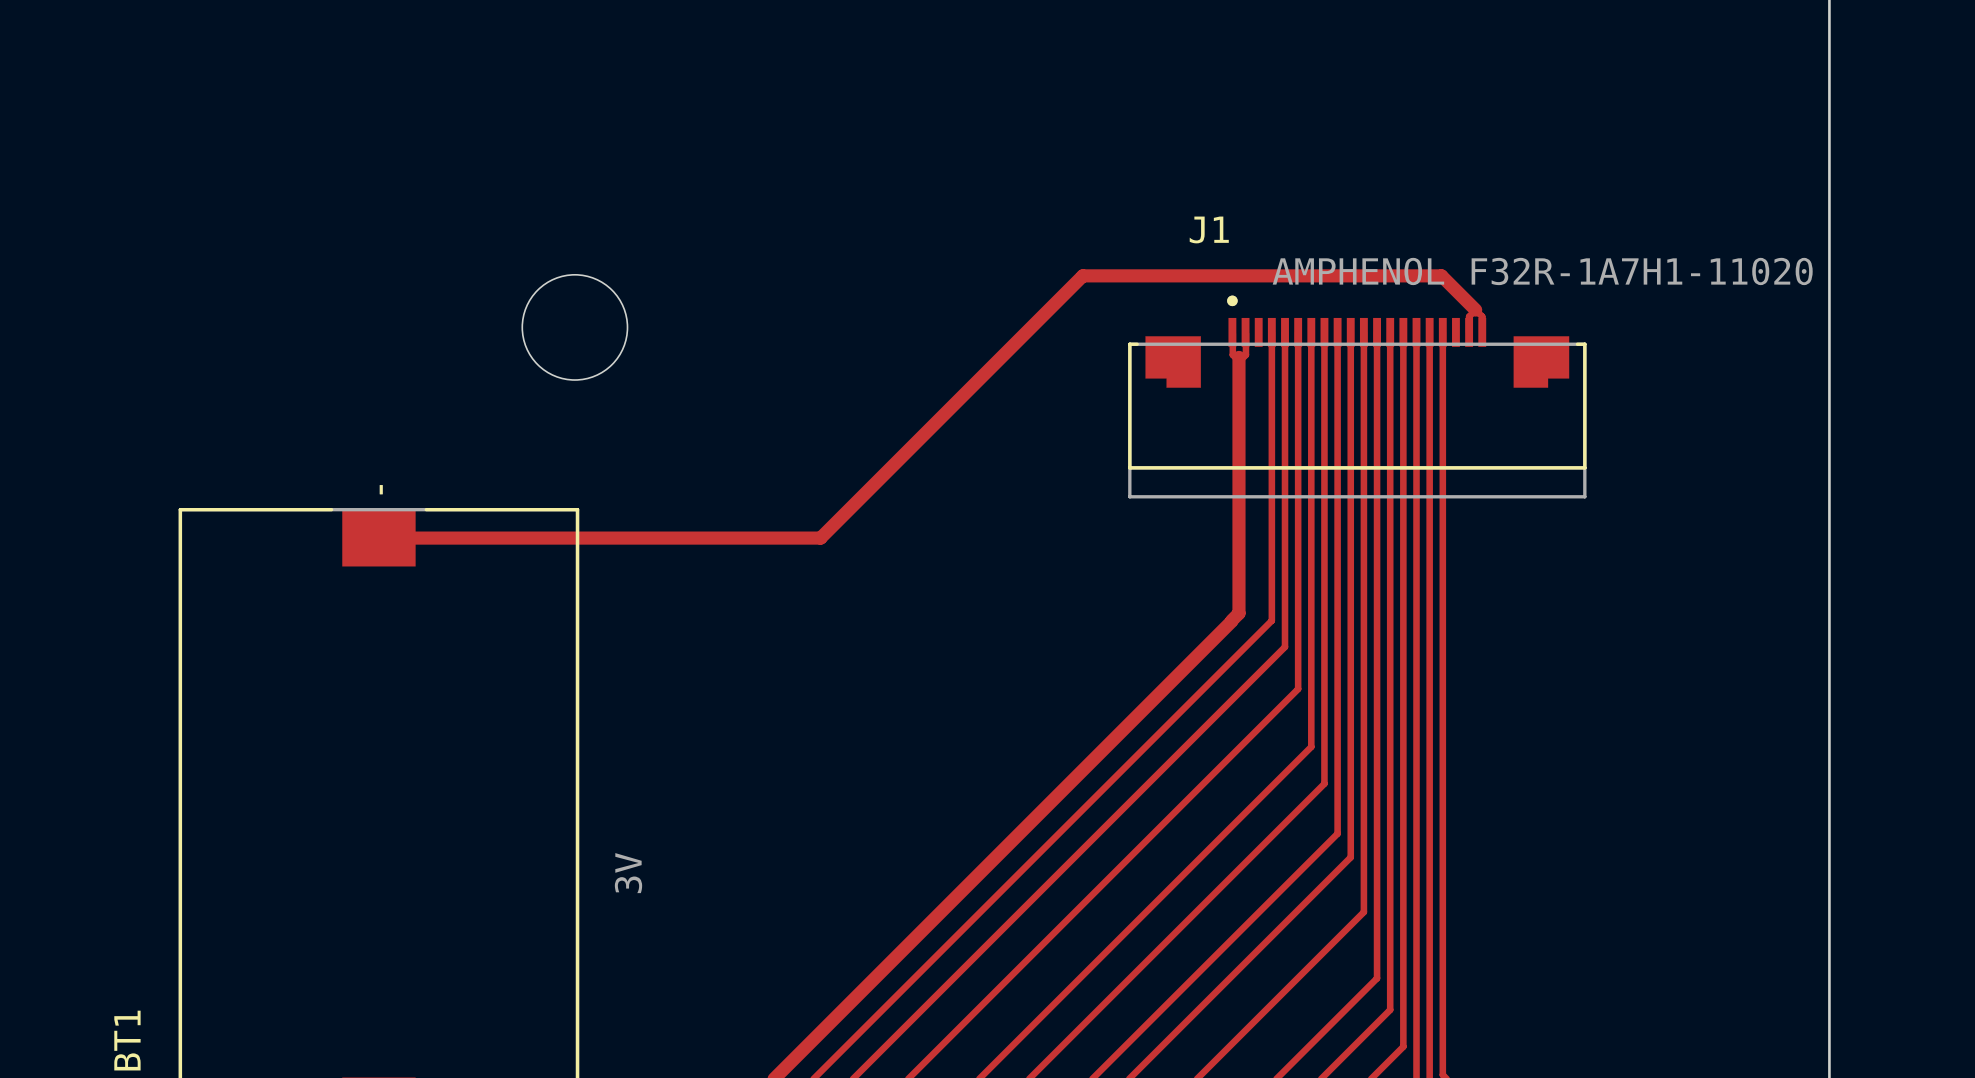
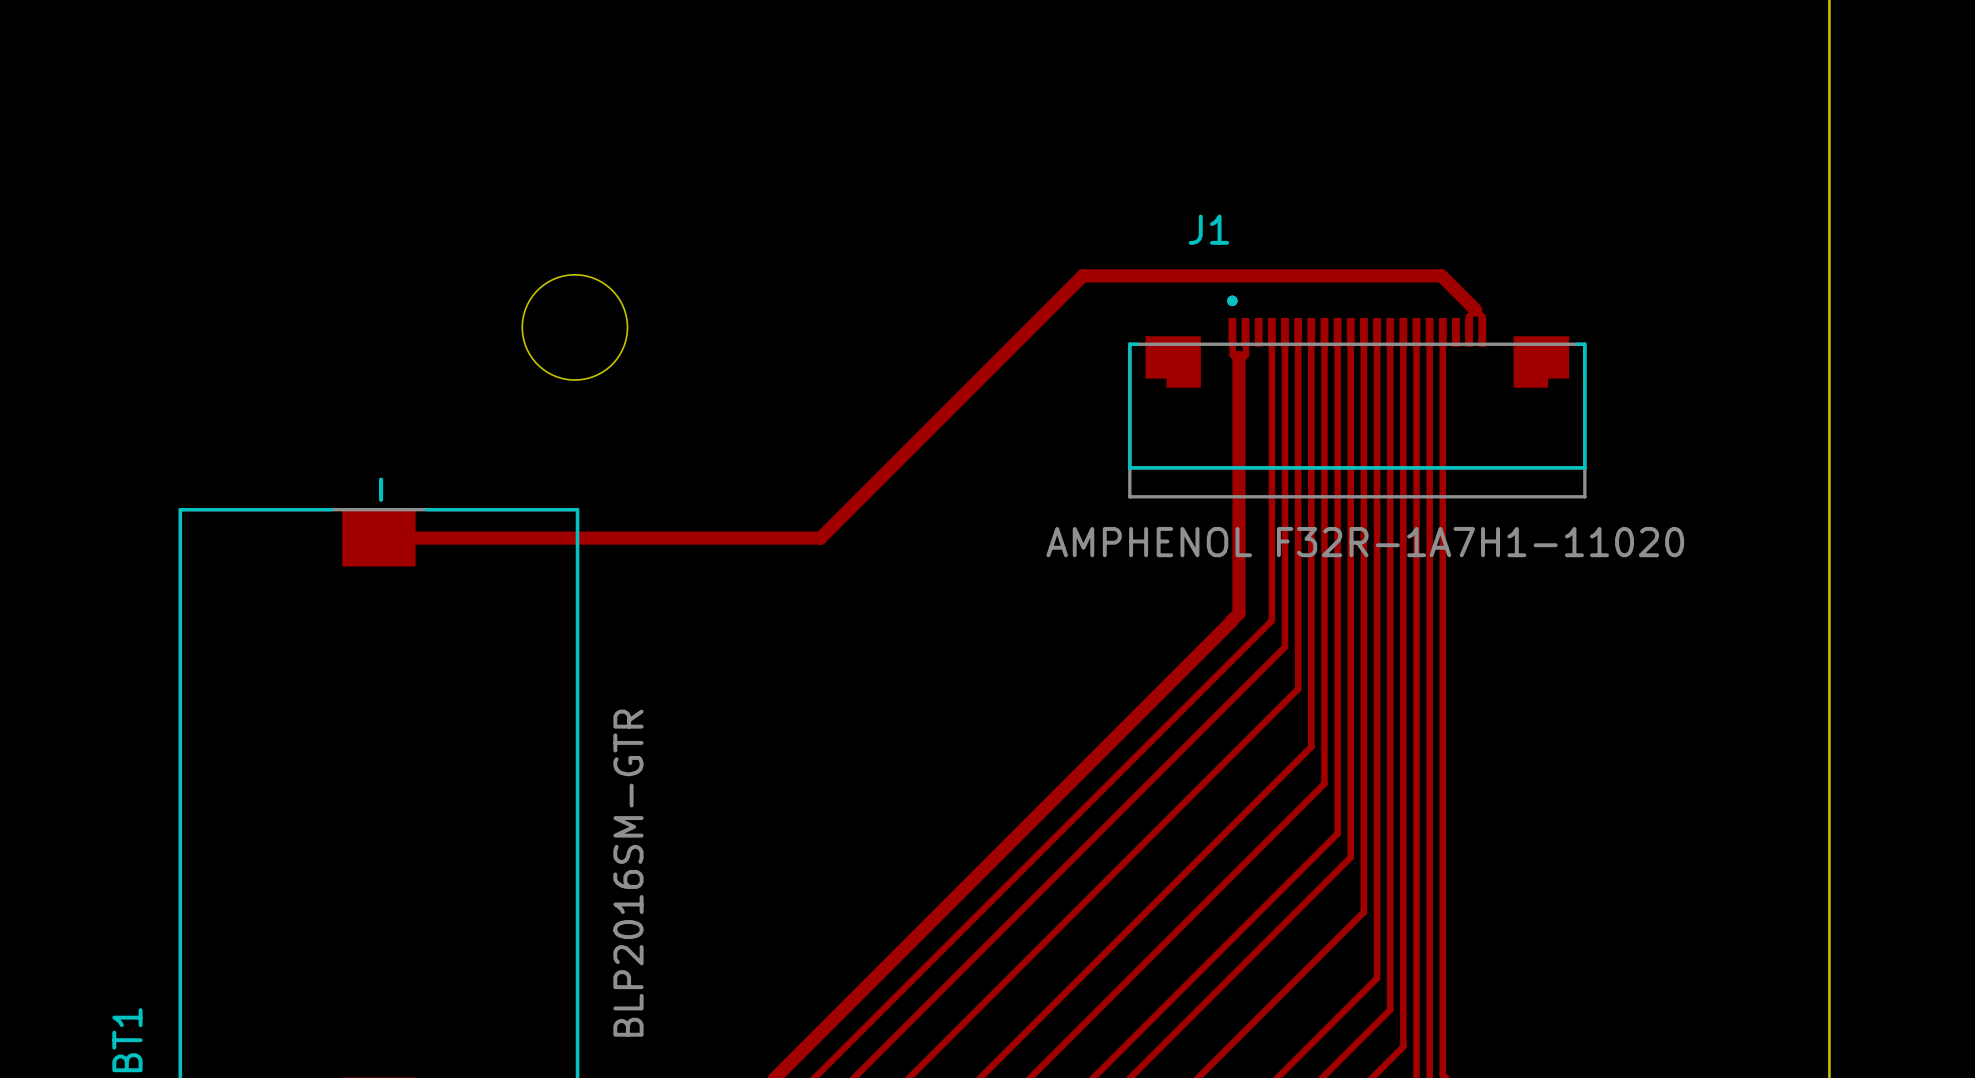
J1 value position: AMPHENOL F32R-1A7H1-11020 (1542, 271) -> AMPHENOL F32R-1A7H1-11020 (1365, 542)
BT1 value: 3V (628, 873) -> BLP2016SM-GTR (628, 873)

